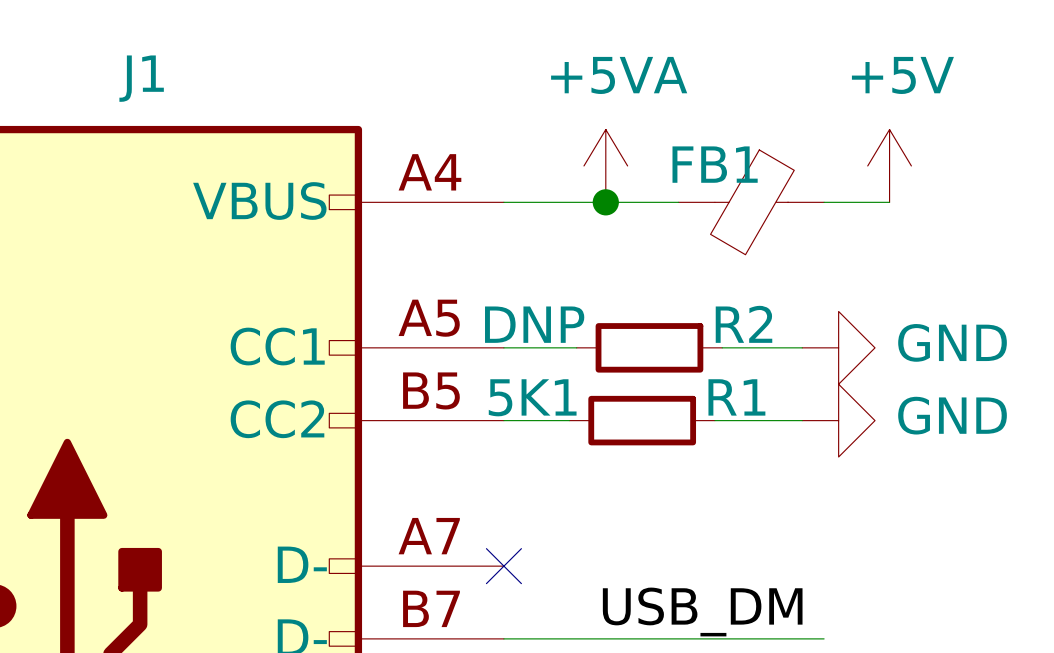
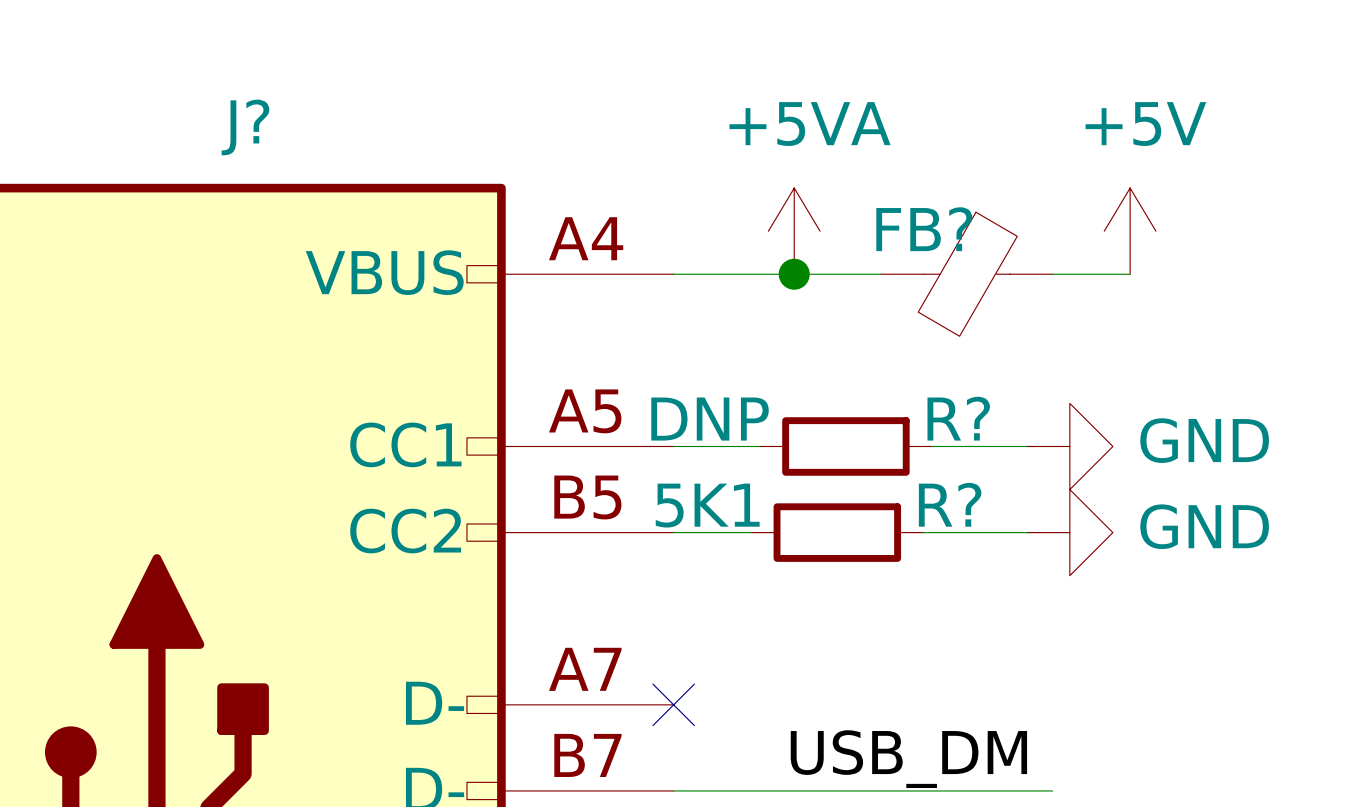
J1 name: J1 (141, 78) -> J? (245, 127)
FB1 name: FB1 (715, 164) -> FB? (924, 229)
R2 name: R2 (743, 324) -> R? (958, 418)
R1 name: R1 (736, 397) -> R? (950, 504)

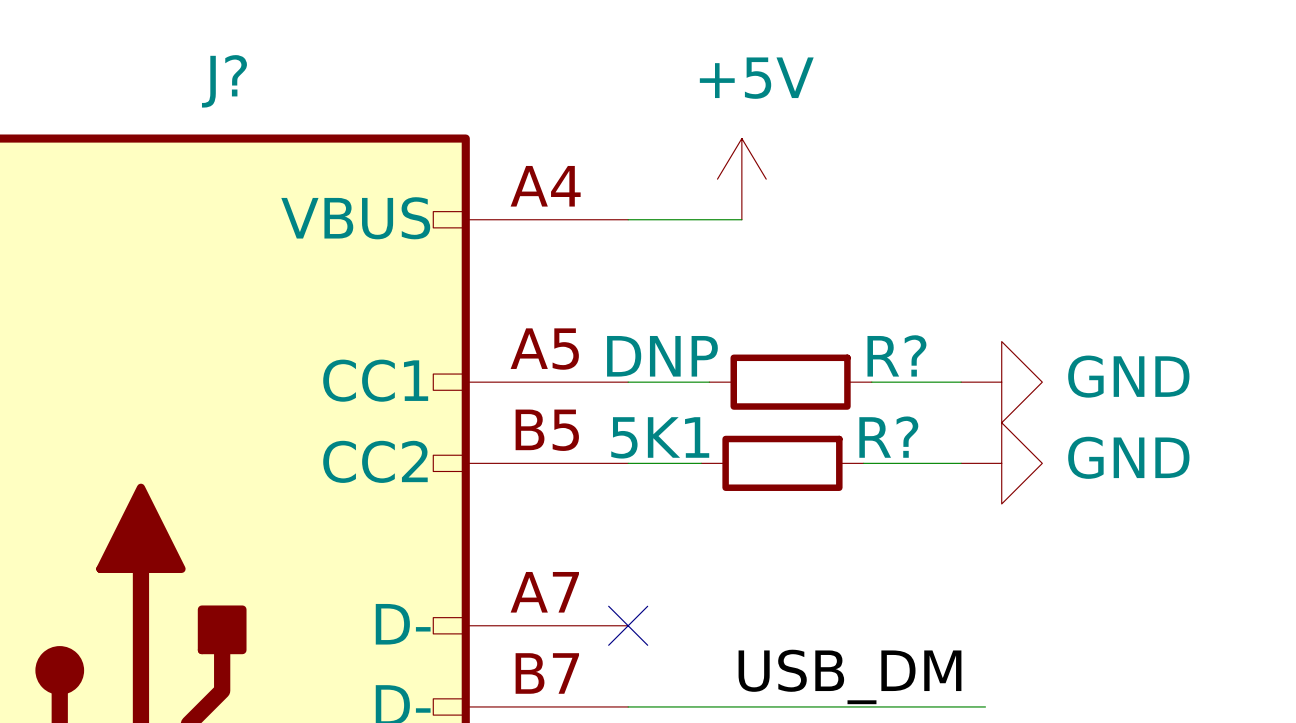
power symbol: +5VA (794, 231) -> +5V (741, 179)
power symbol: +5V (1130, 231) -> none
wire: (794, 274) (880, 274) -> none
junction: (794, 274) -> none
FB?: (966, 274) -> none
wire: (1052, 274) (1130, 274) -> none

